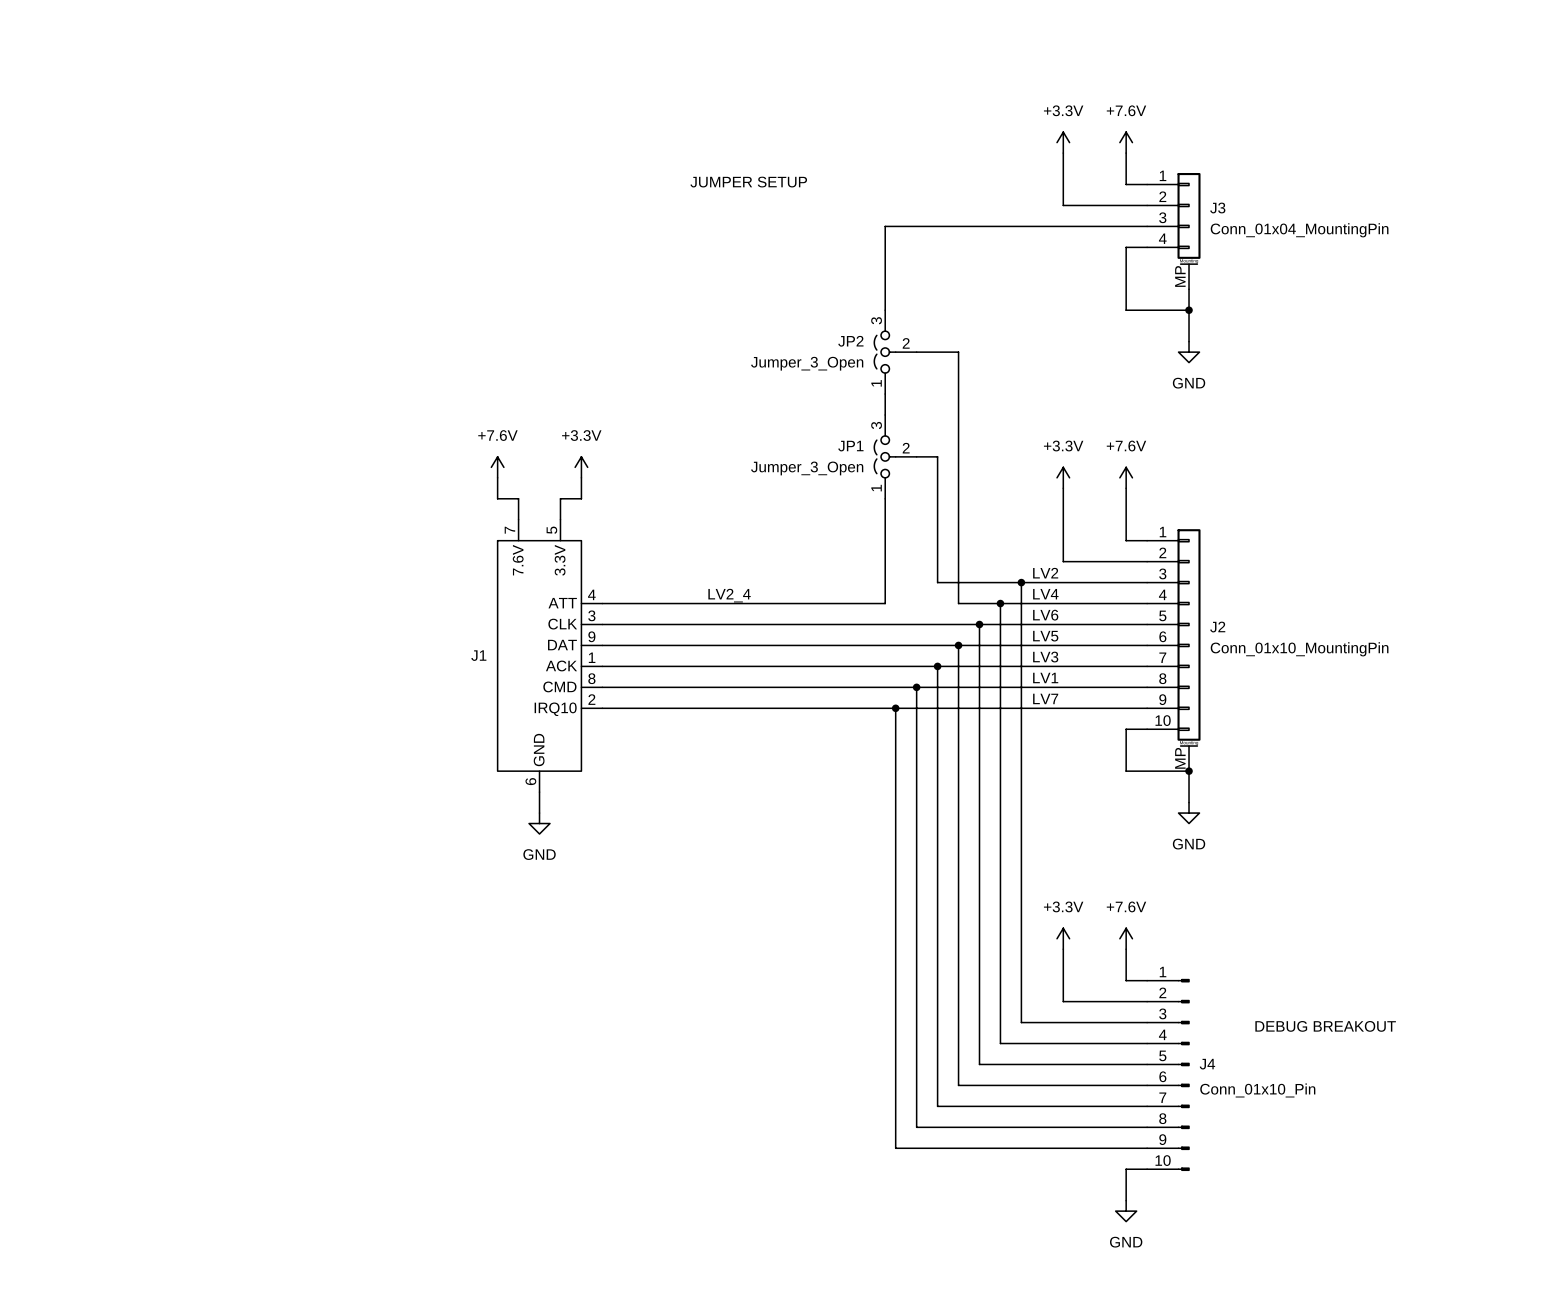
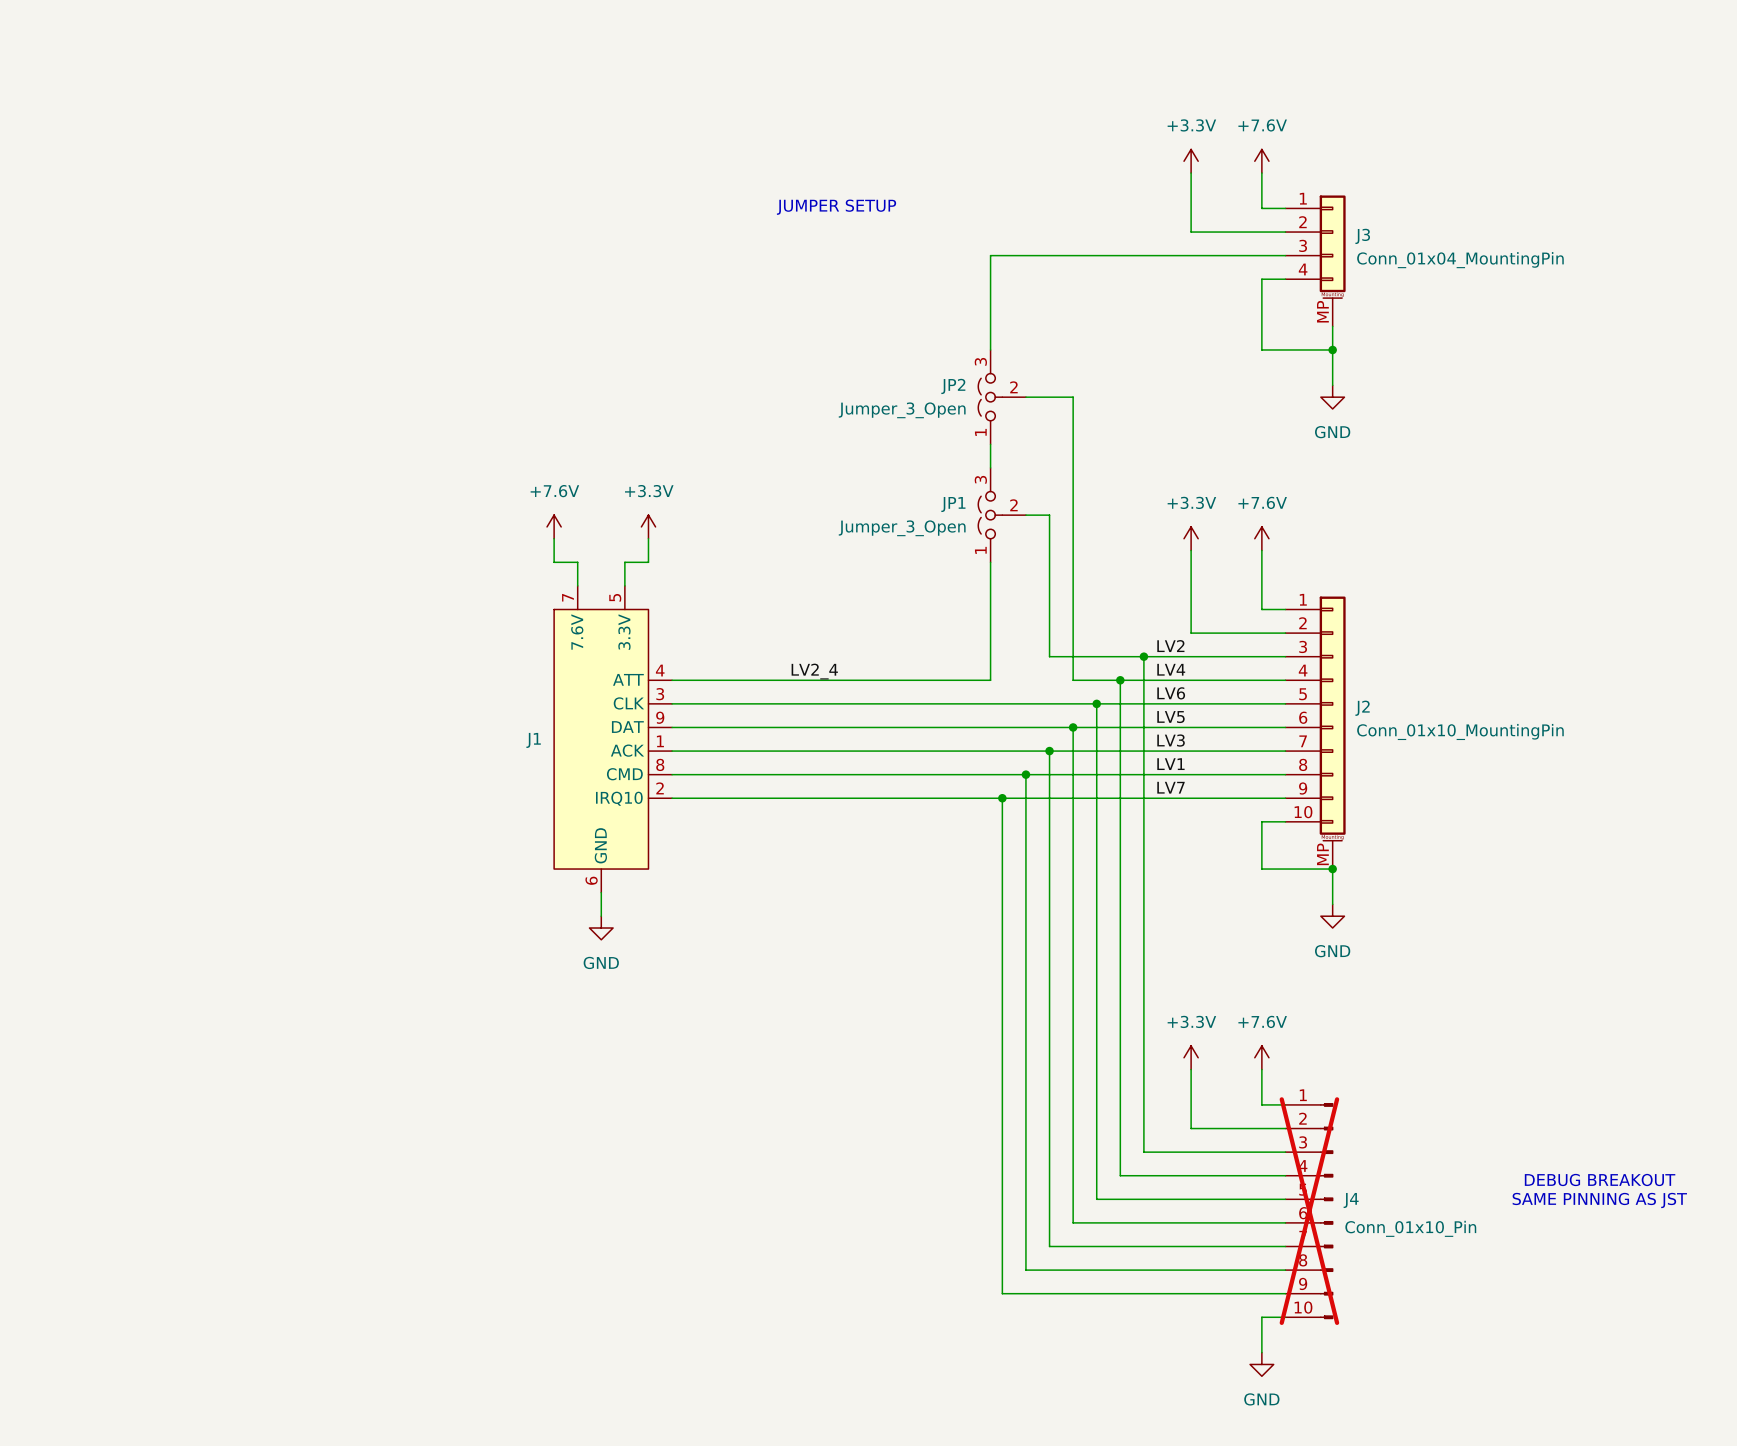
text position: DEBUG BREAKOUT (1325, 1026) -> DEBUG BREAKOUT (1600, 1179)
text: none -> SAME PINNING AS JST (1599, 1200)
J4 do-not-place cross: none -> (1309, 1211)

